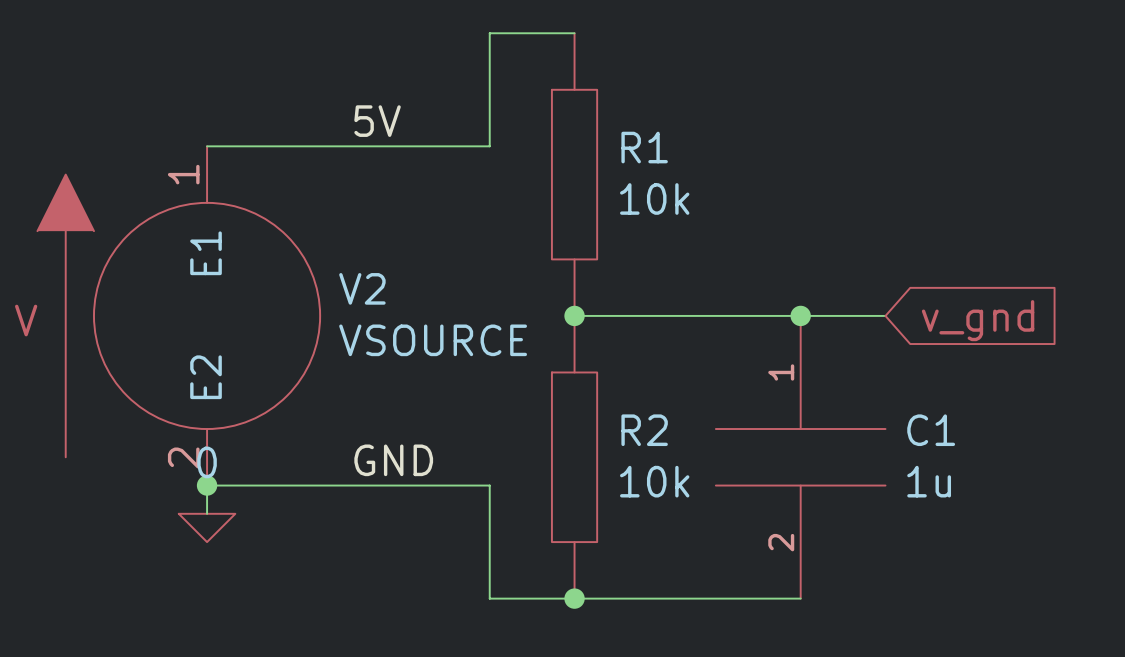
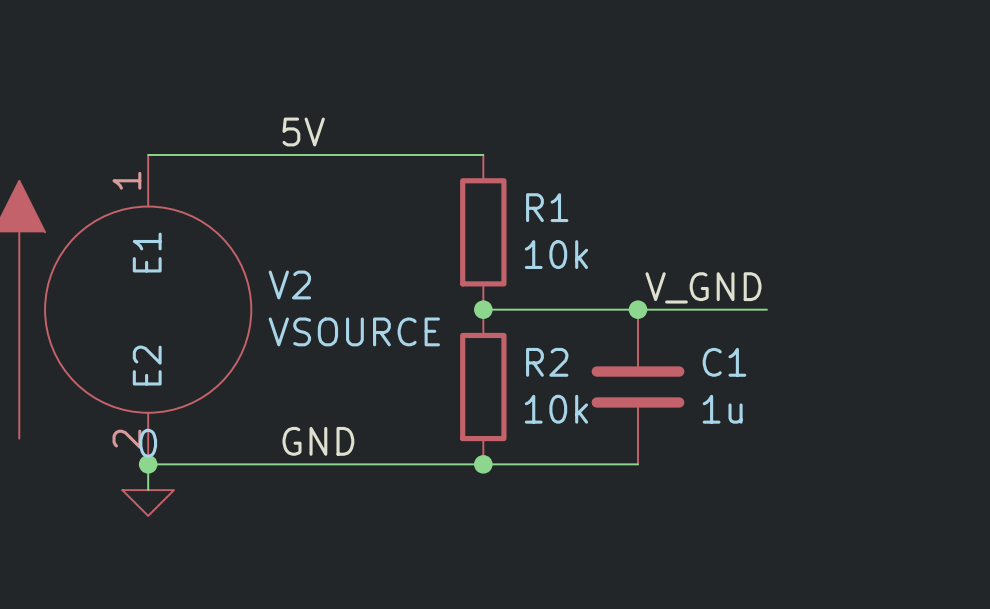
R1 symbol: [551, 33, 598, 316] -> [460, 154, 507, 310]
wire: (574, 33) (489, 33) (489, 146) -> (483, 154) (405, 154)
label: none -> V_GND (703, 287)
R2 symbol: [551, 315, 598, 599] -> [460, 309, 507, 465]
C1 symbol: [715, 315, 886, 599] -> [591, 309, 685, 465]
junction position: (800, 315) -> (638, 309)
global label: v_gnd (978, 320) -> none
wire: (489, 485) (489, 598) (800, 598) -> (405, 464) (638, 464)
junction position: (574, 598) -> (483, 464)

